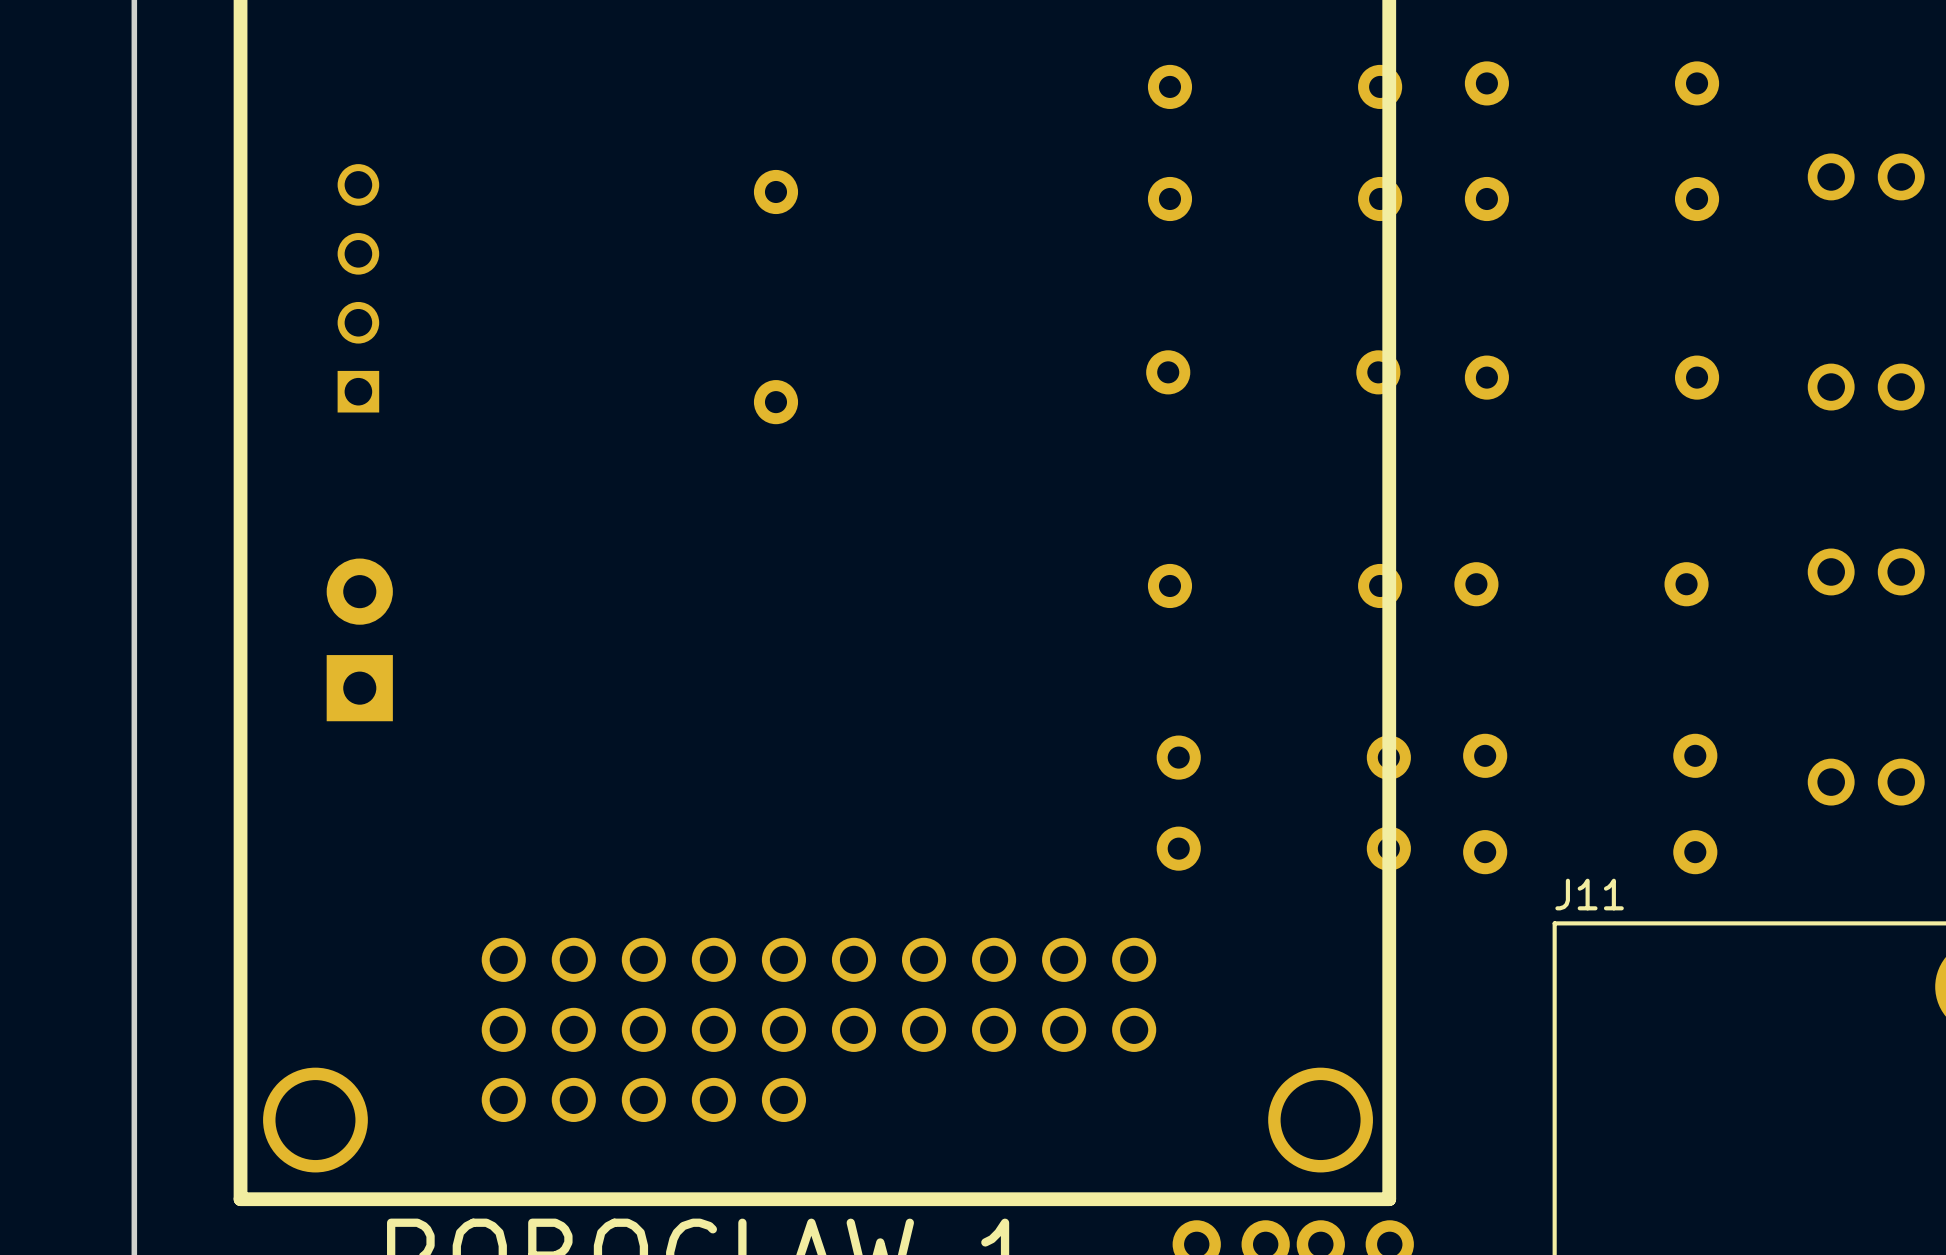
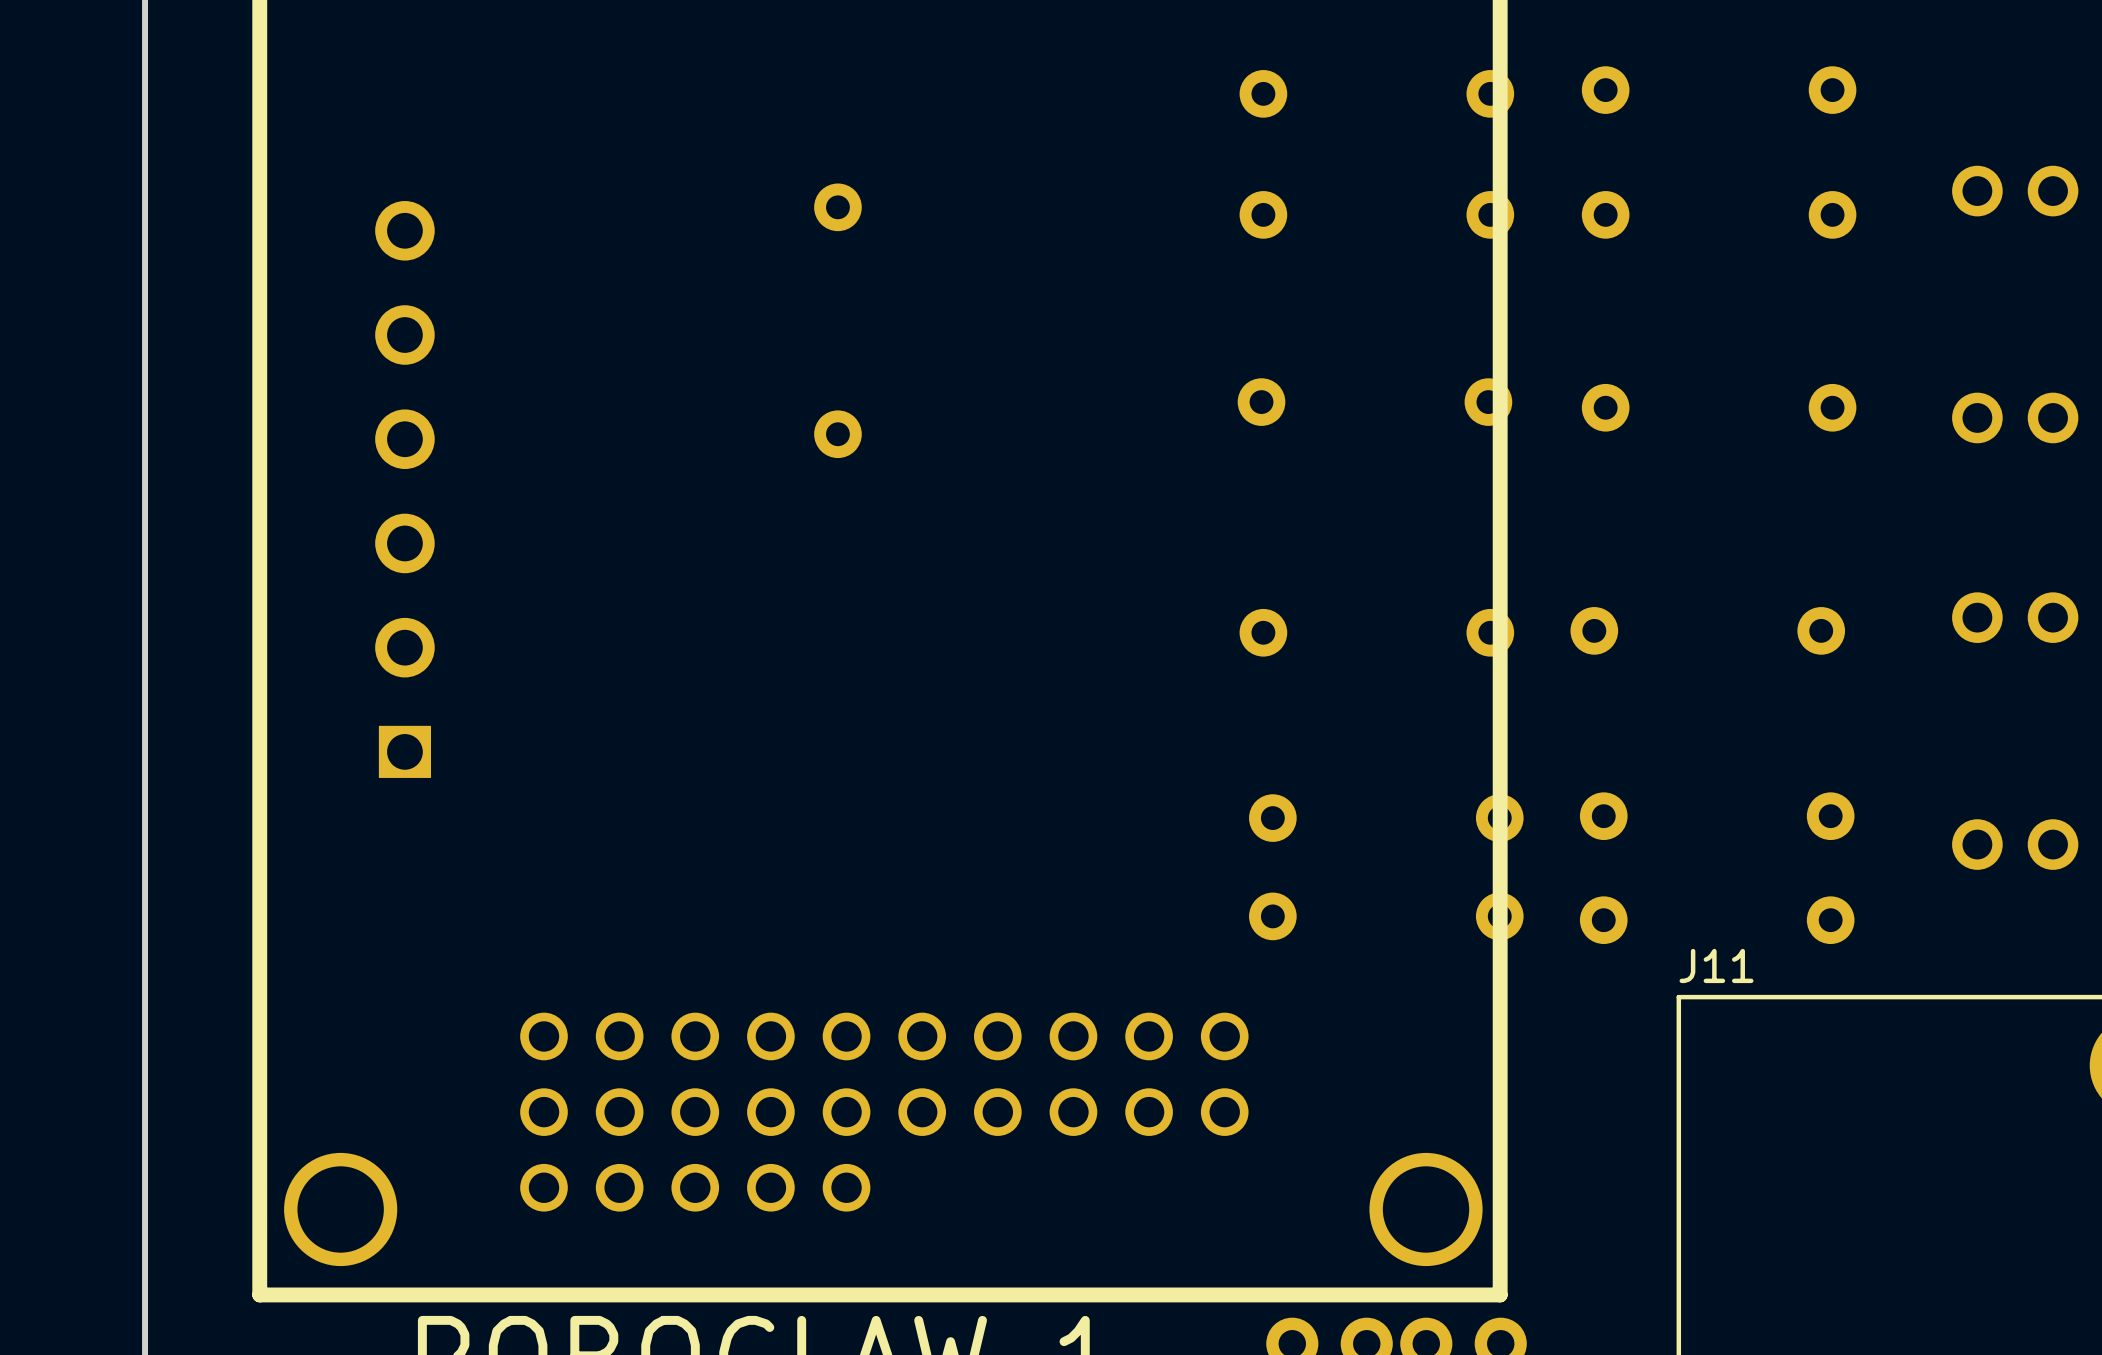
part: (358, 288) -> none
part: none -> (404, 489)
part: (359, 639) -> none

